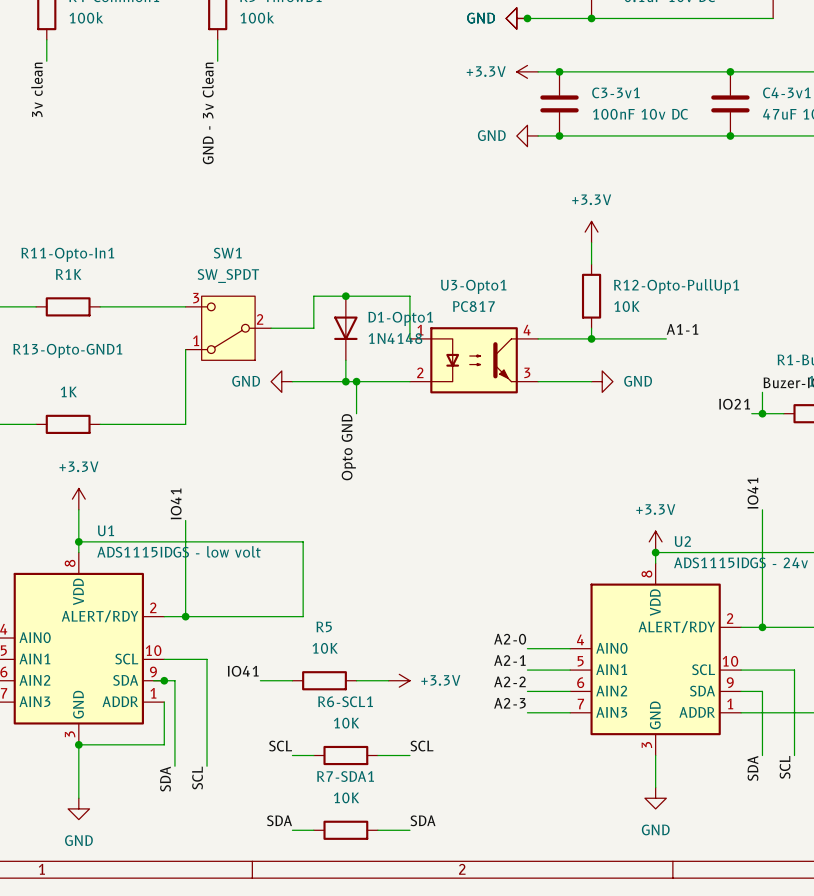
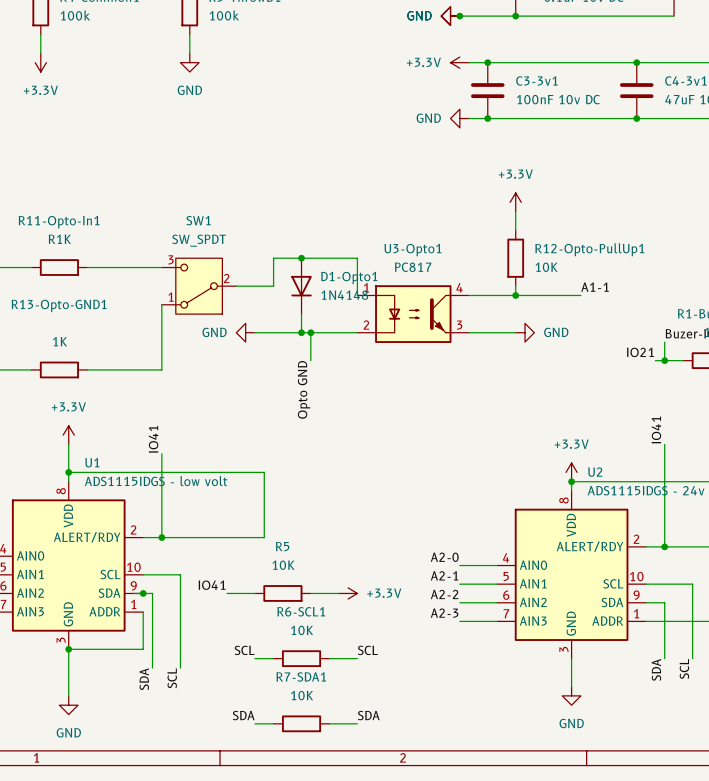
power symbol: none -> +3.3V (40, 62)
power symbol: none -> GND (189, 62)
label: 3v clean (36, 89) -> none
label: GND - 3v Clean (207, 113) -> none

